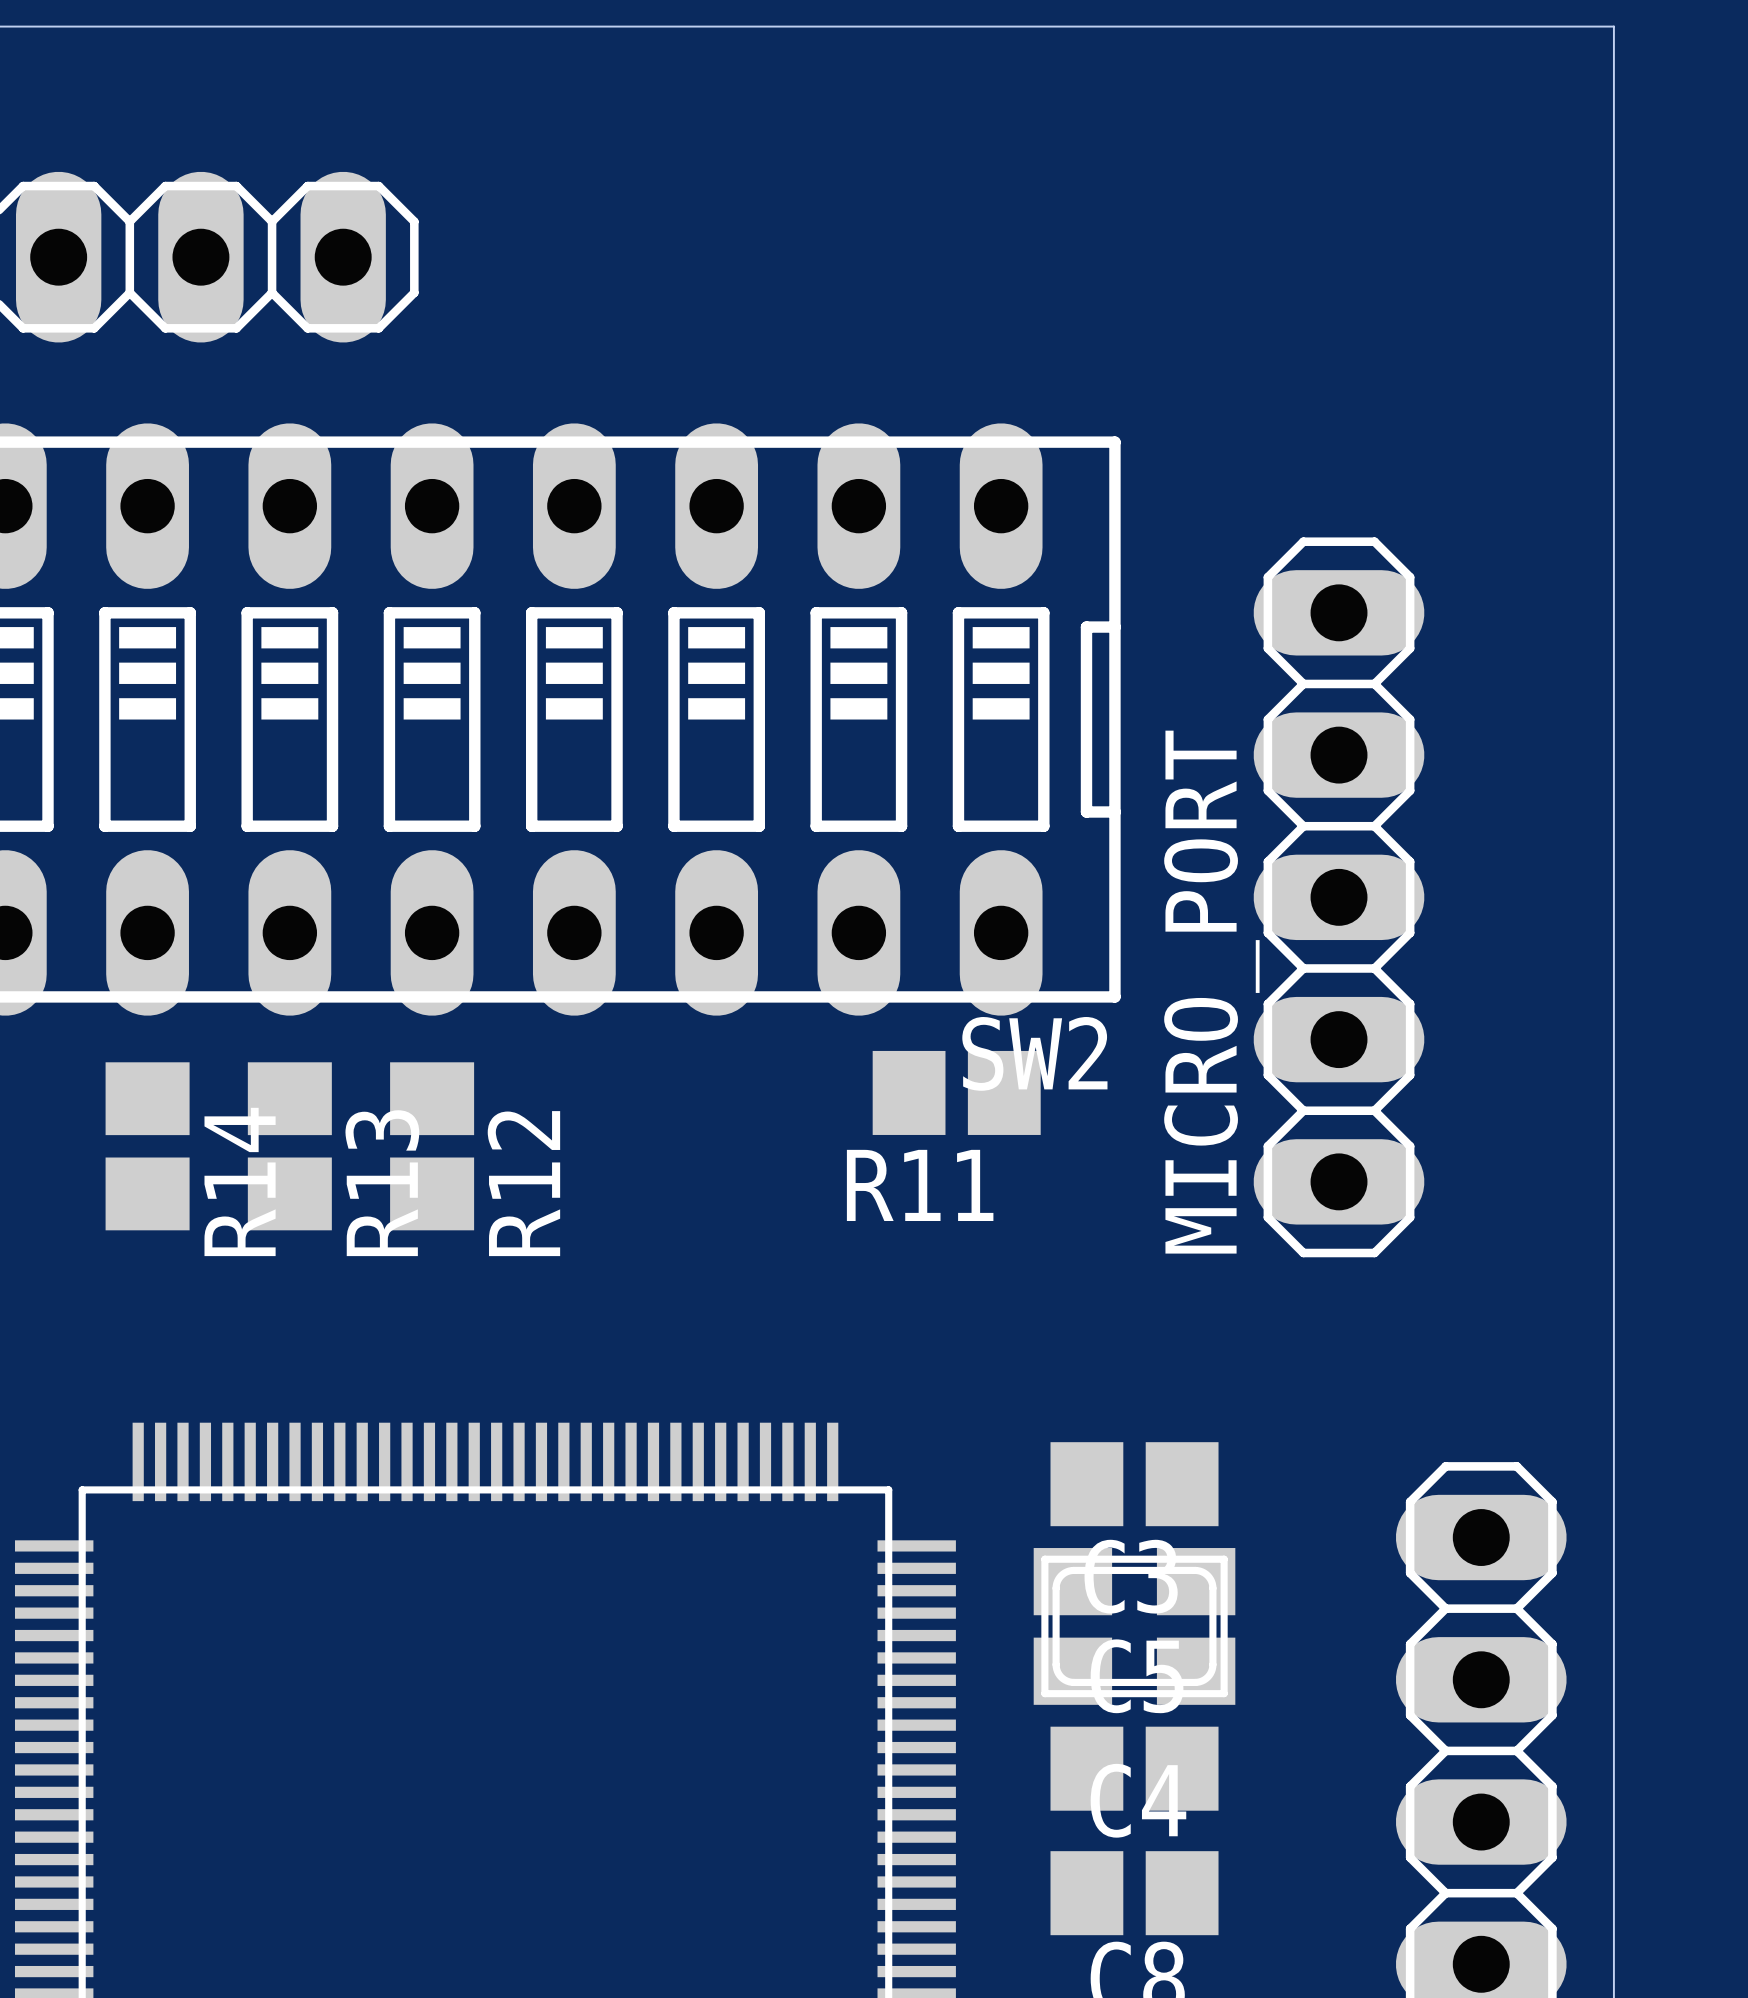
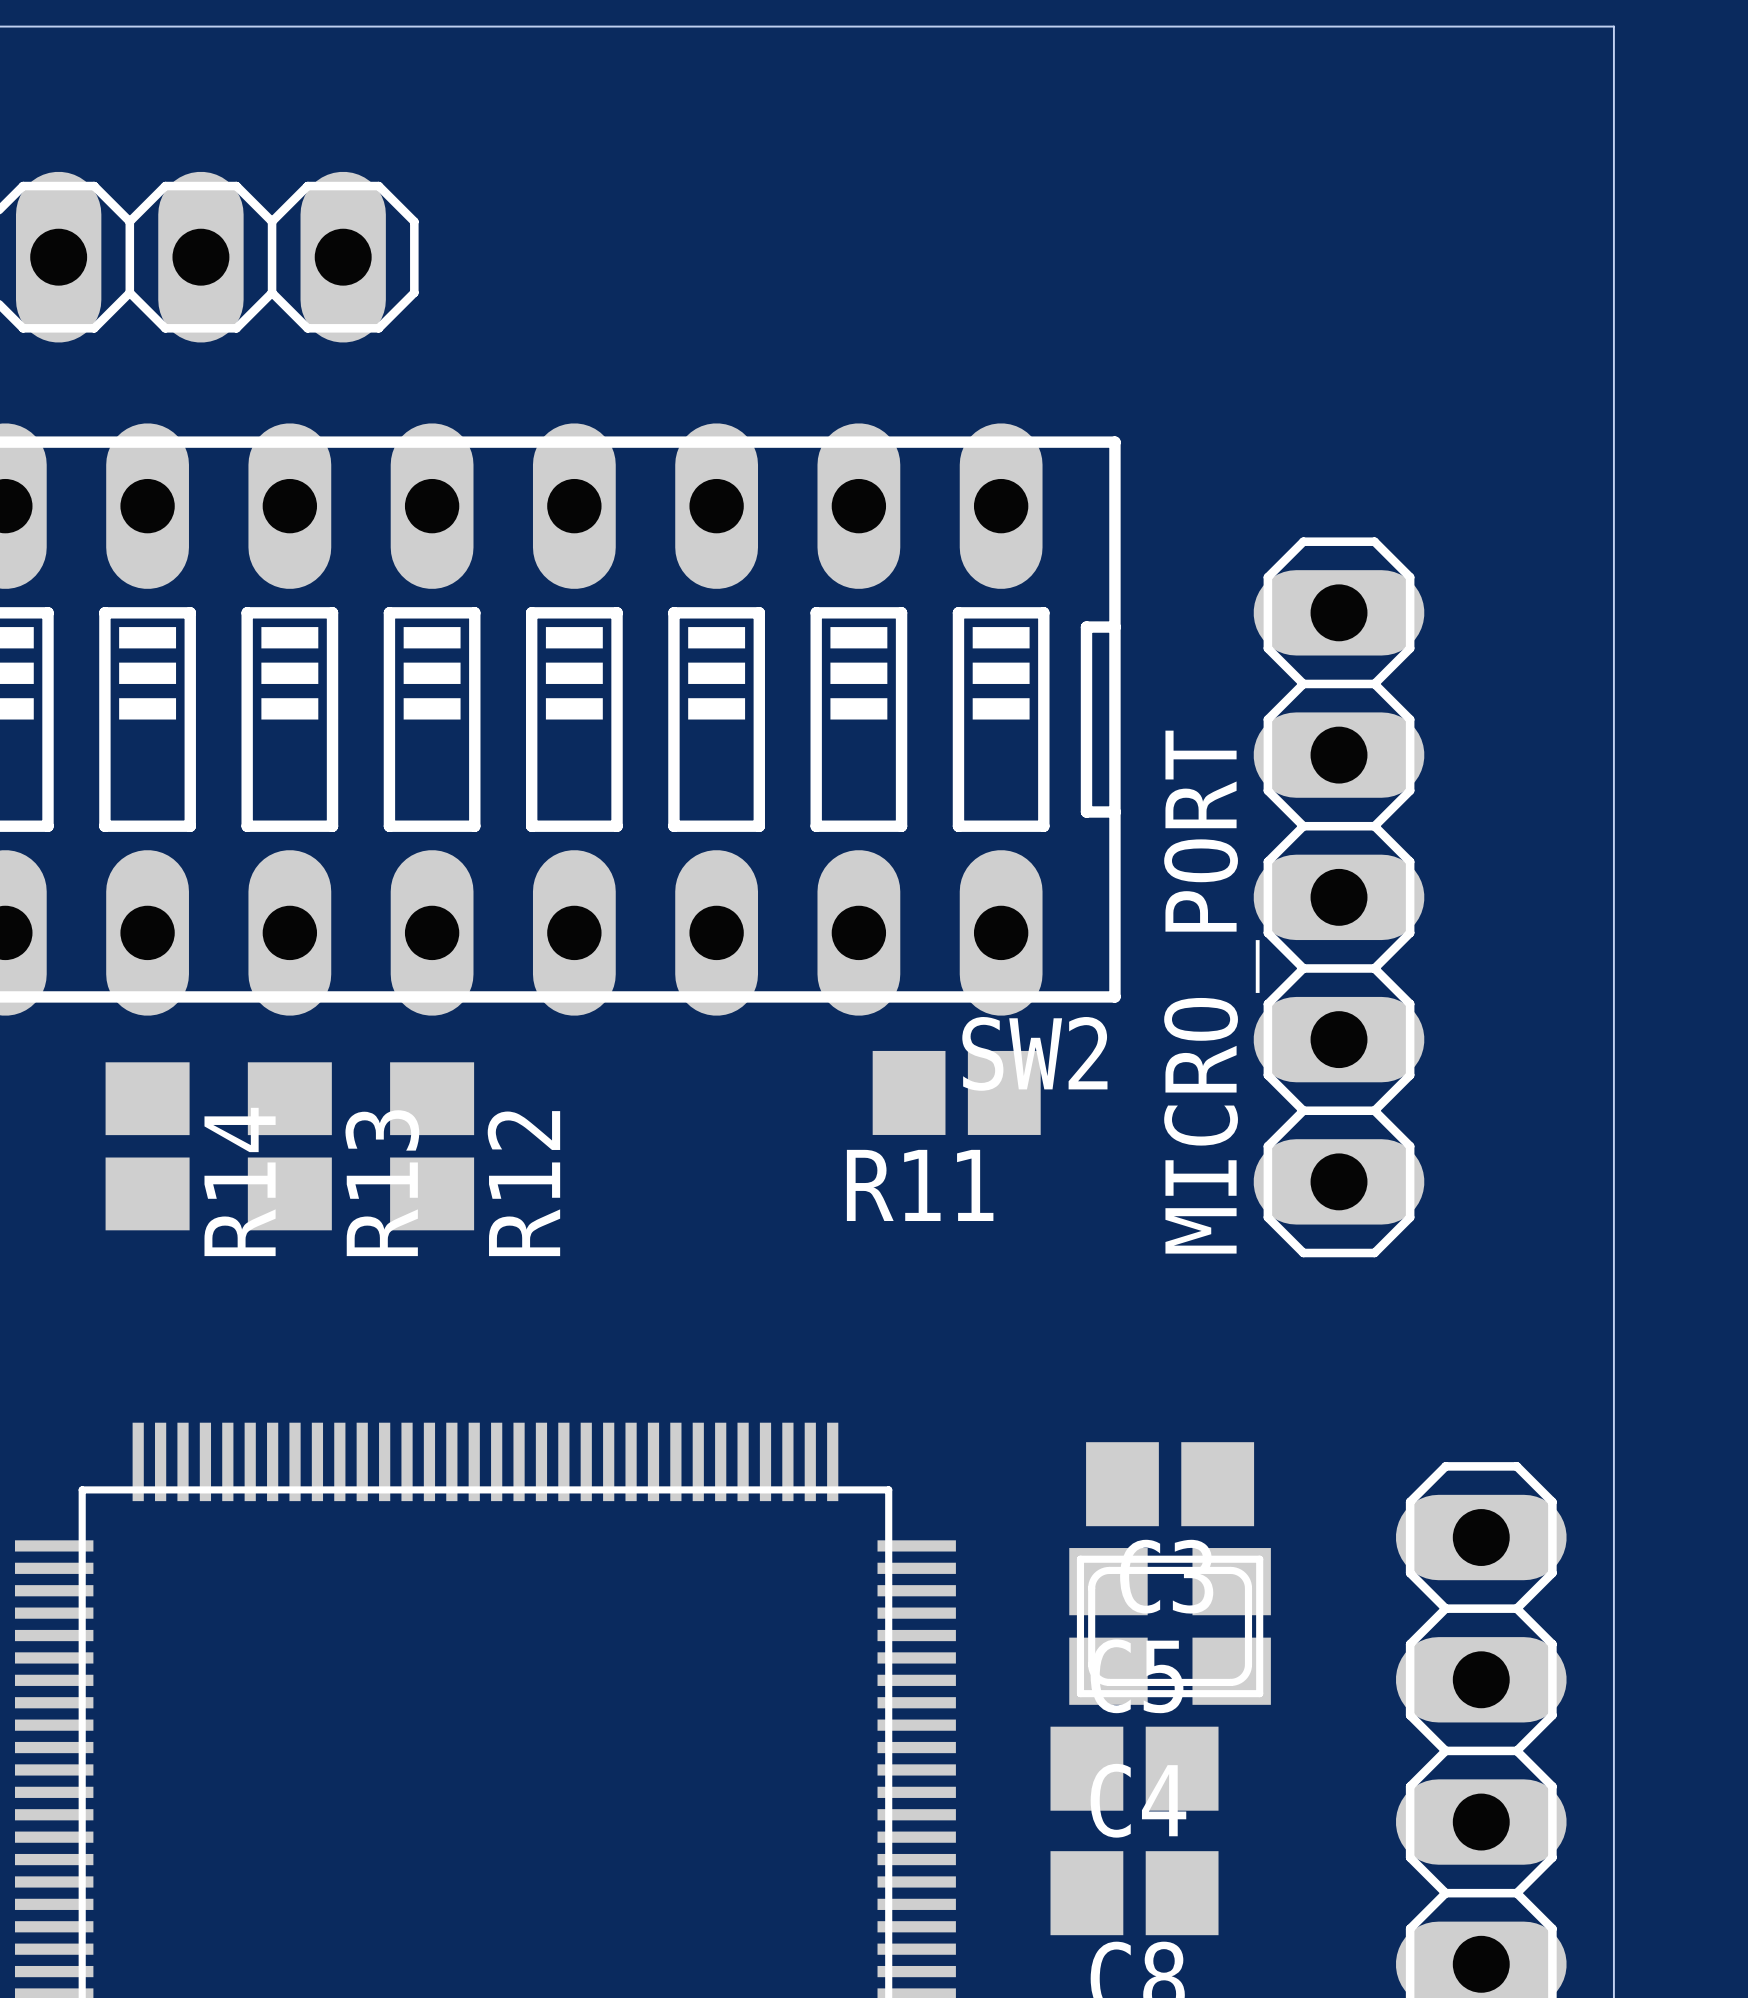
part position: (1134, 1484) -> (1170, 1484)
part position: (1134, 1626) -> (1170, 1626)

